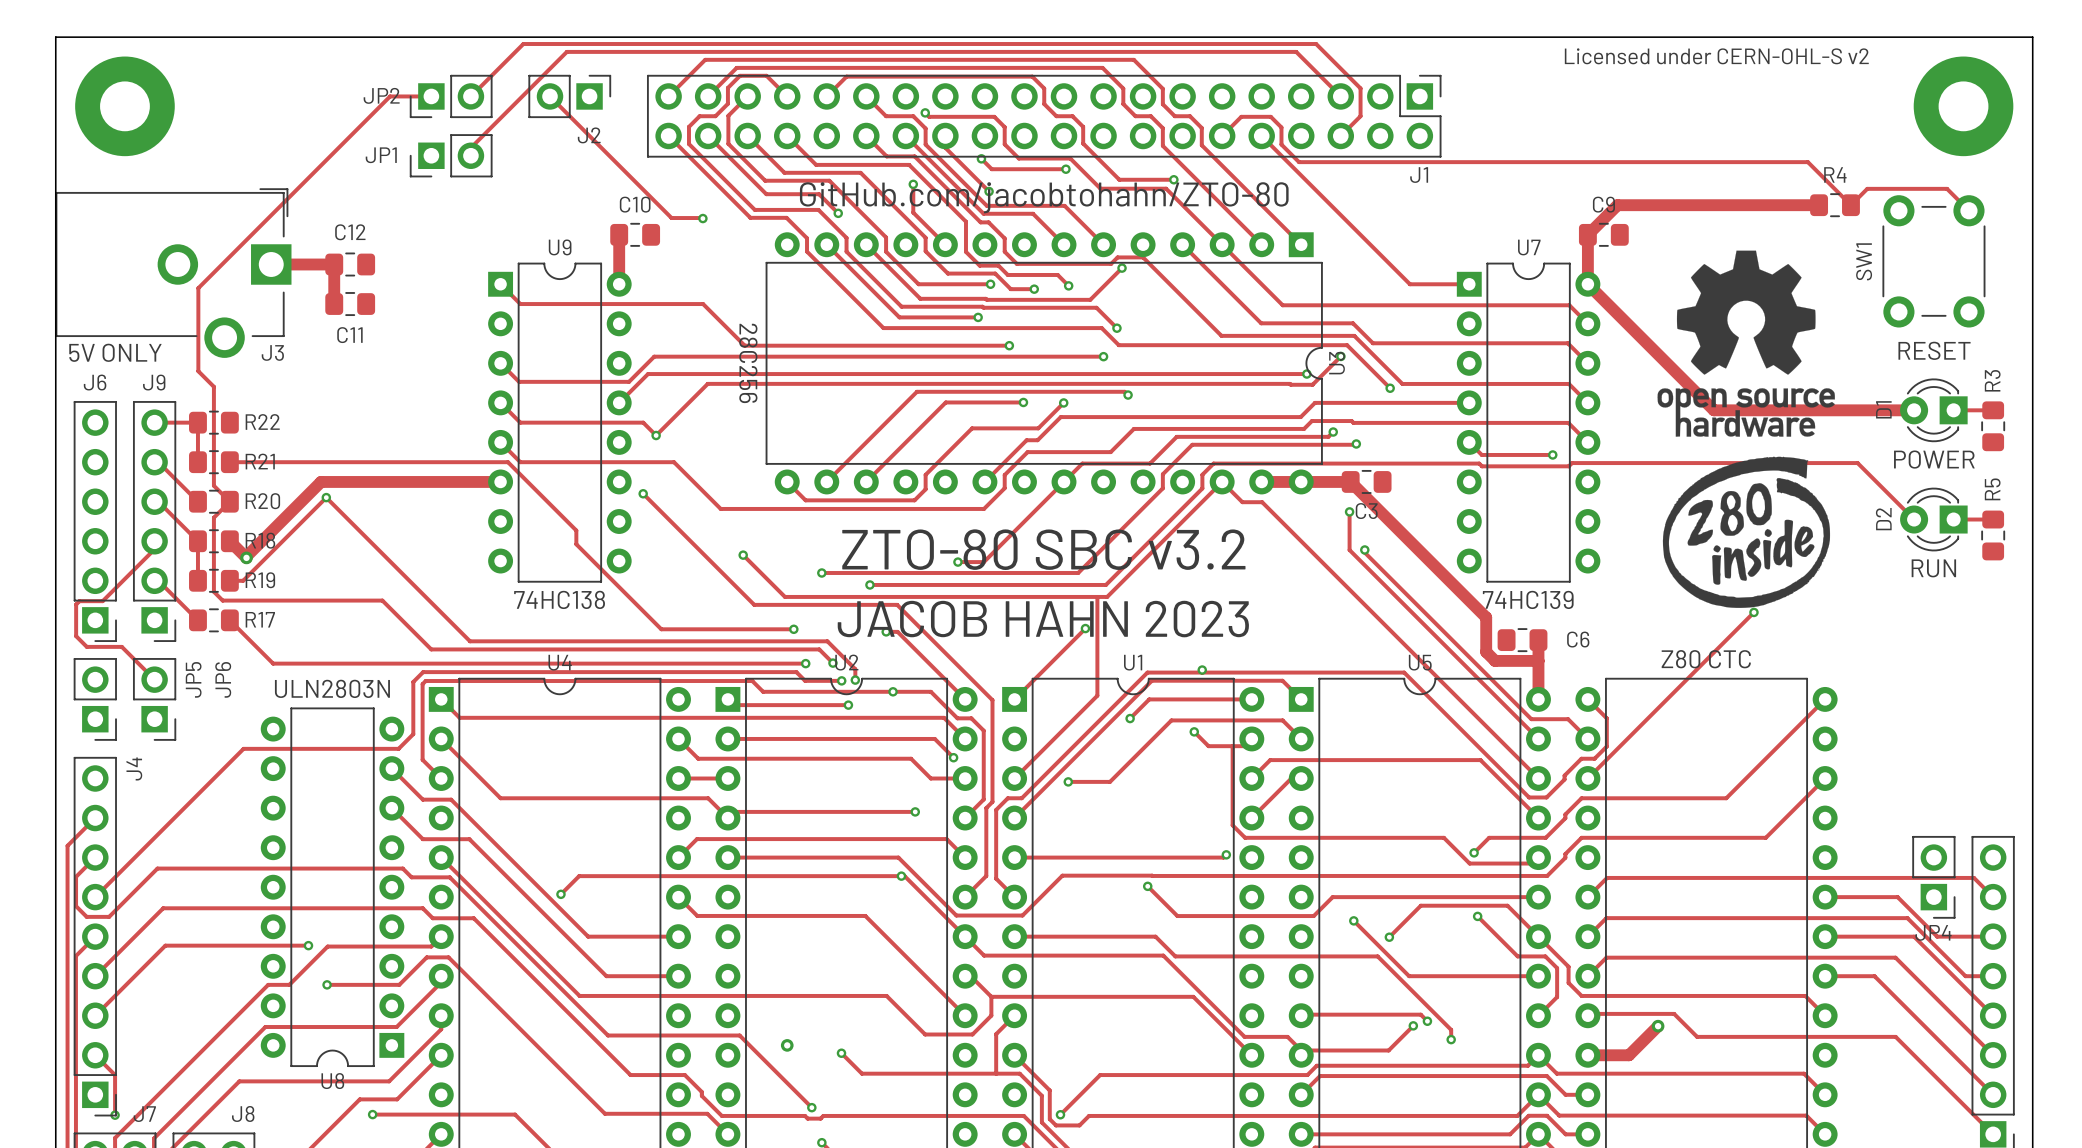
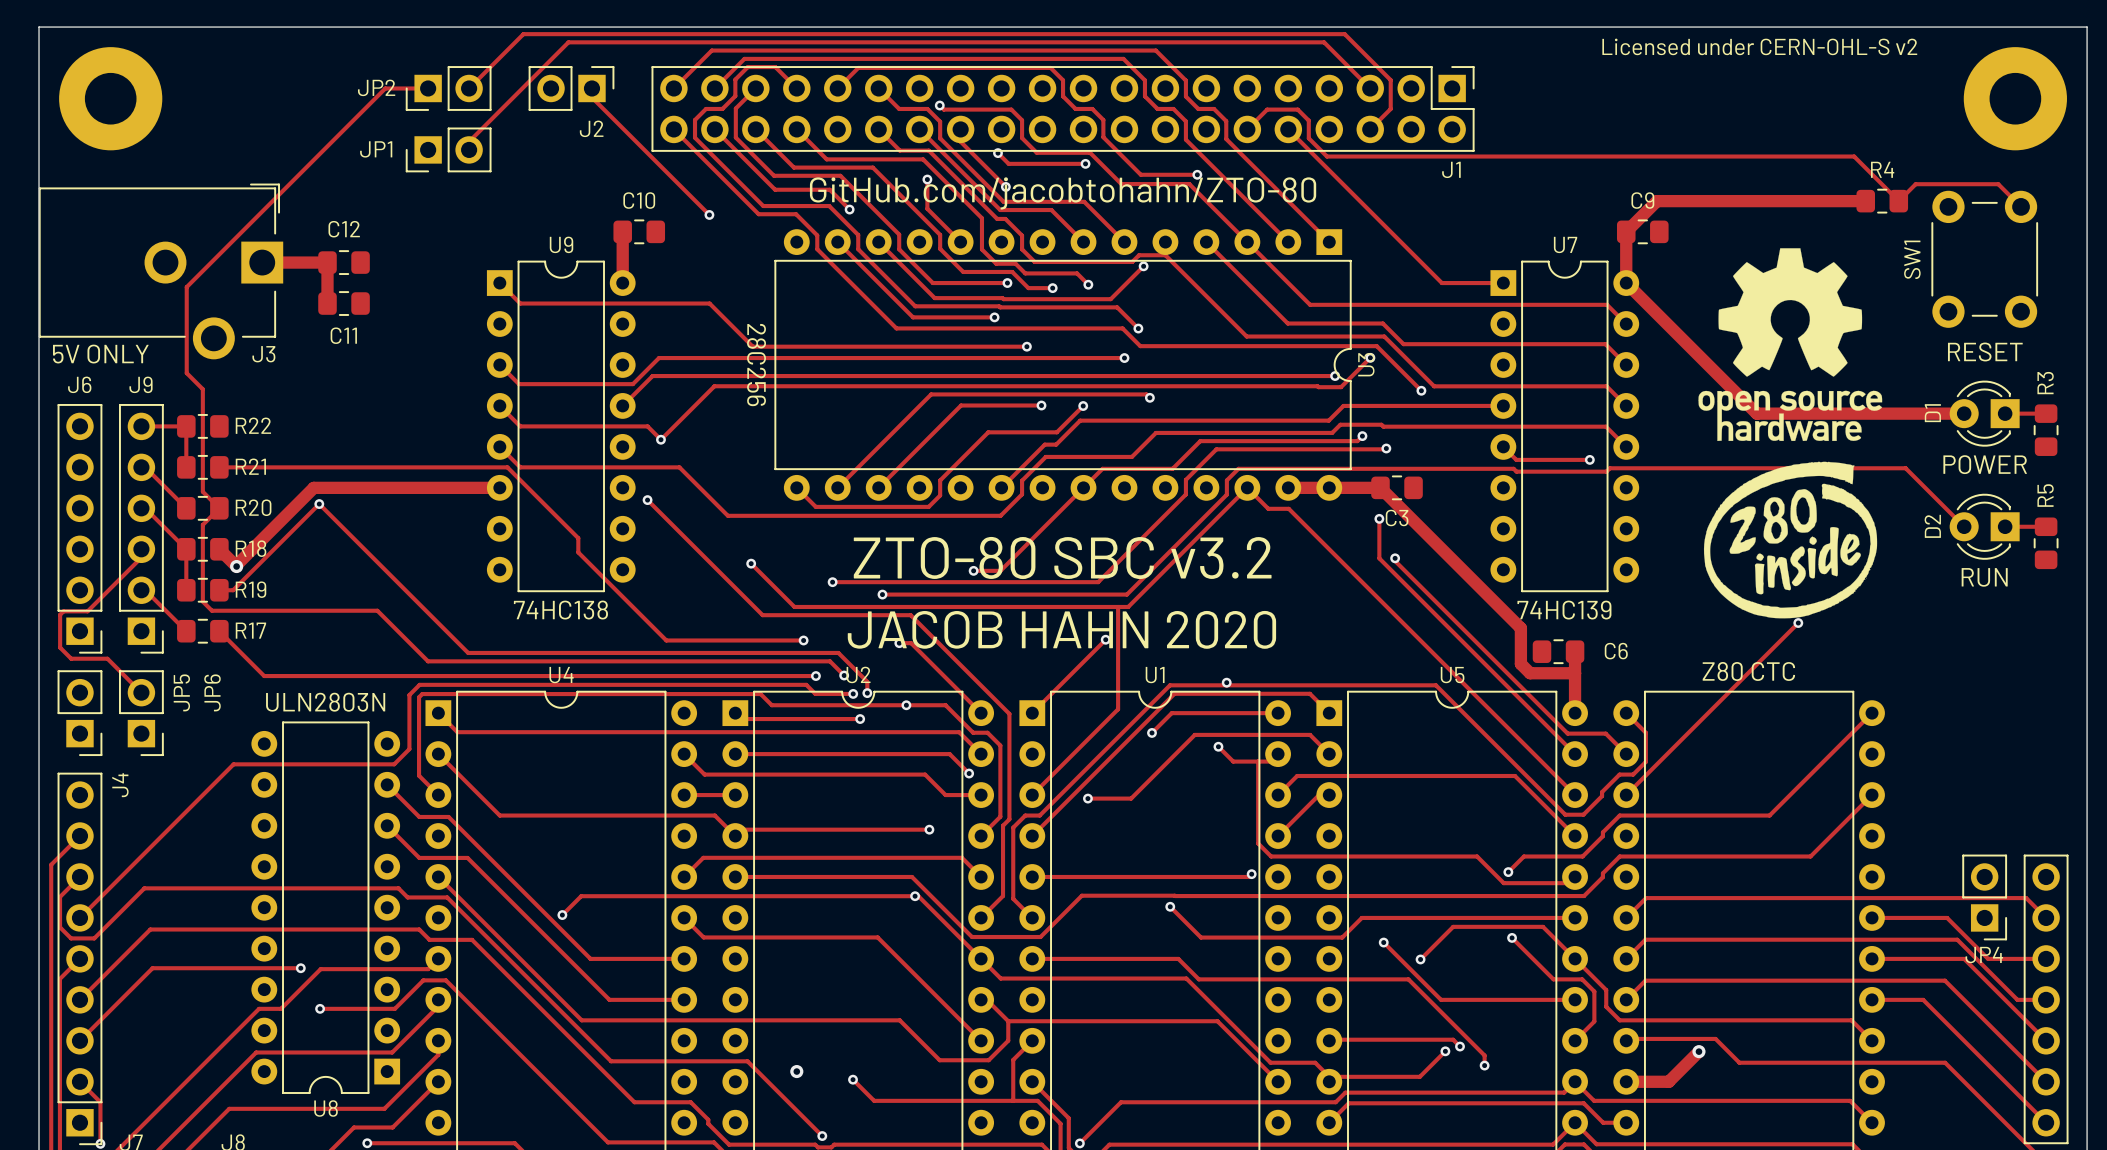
track: (550, 96) (671, 218) (702, 218) -> (591, 88) (591, 97) (708, 214)
text: JACOB HAHN 2023 (1043, 619) -> JACOB HAHN 2020 (1061, 629)

